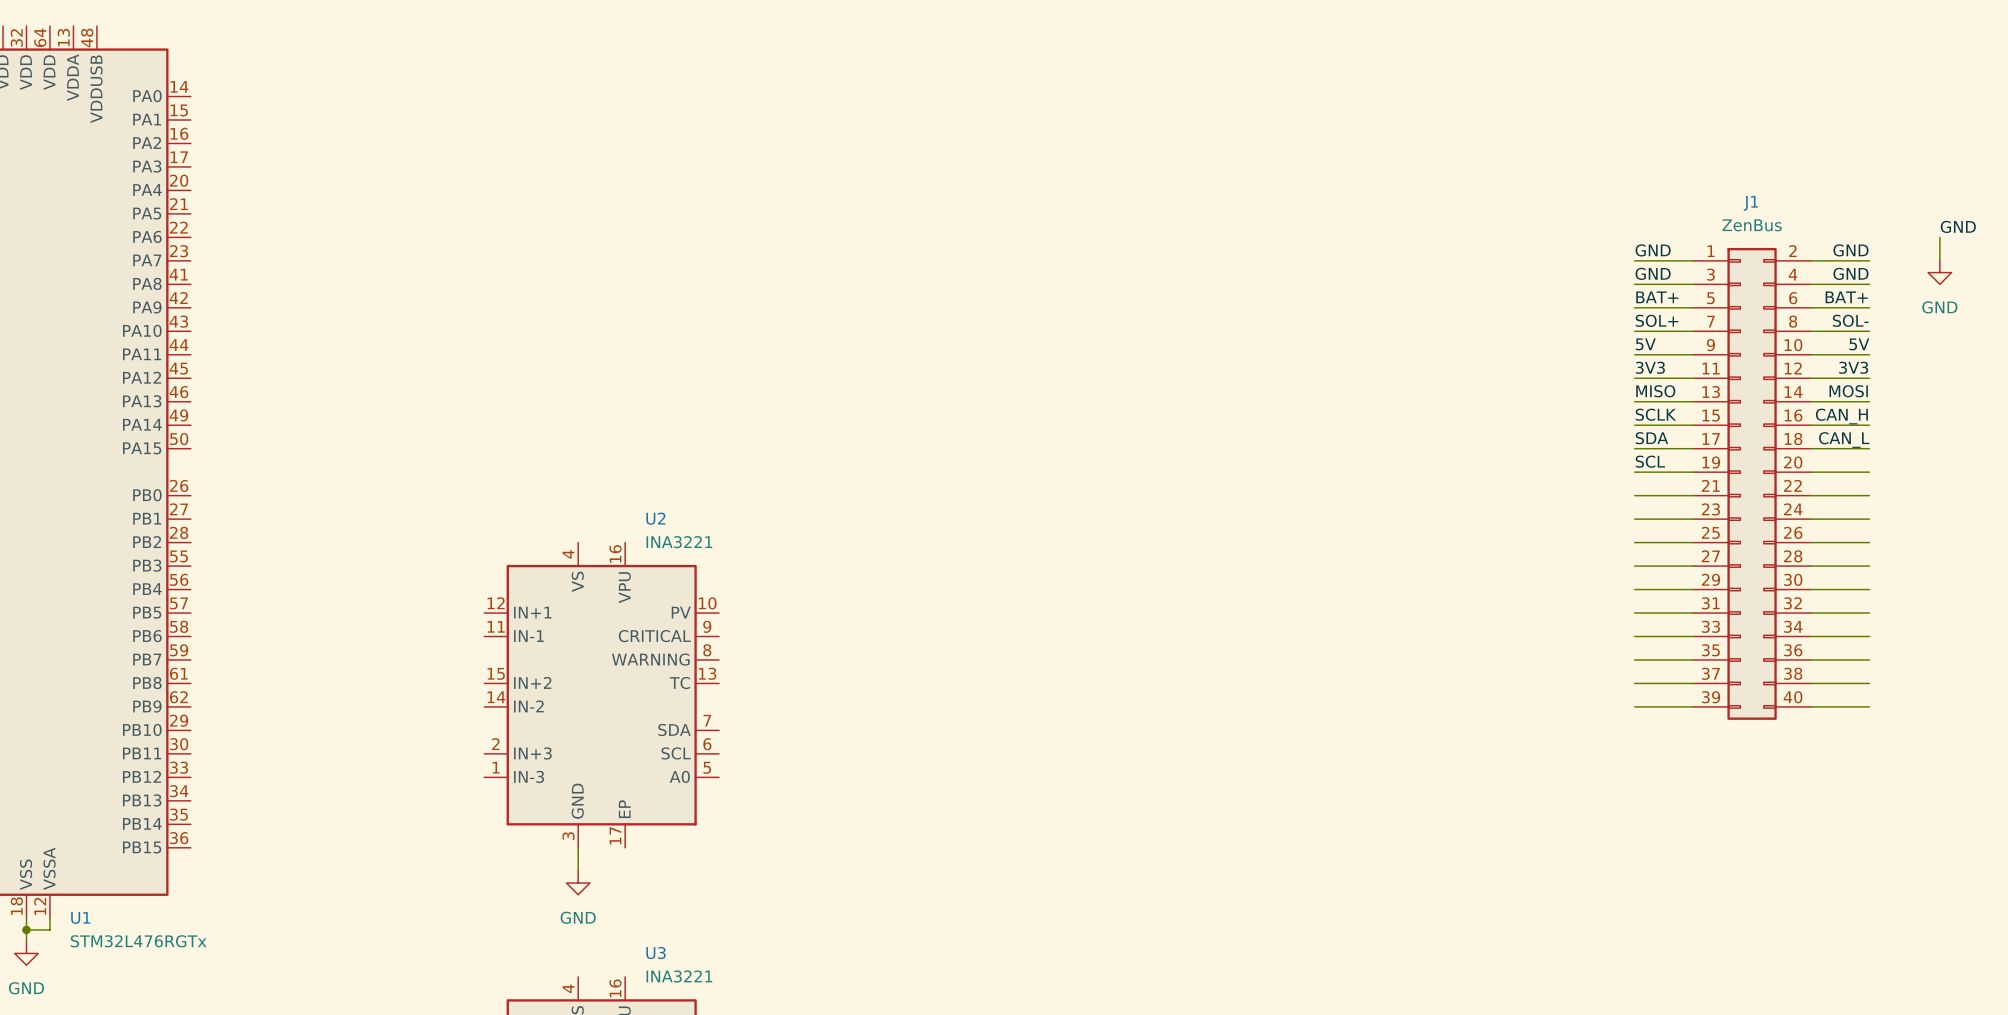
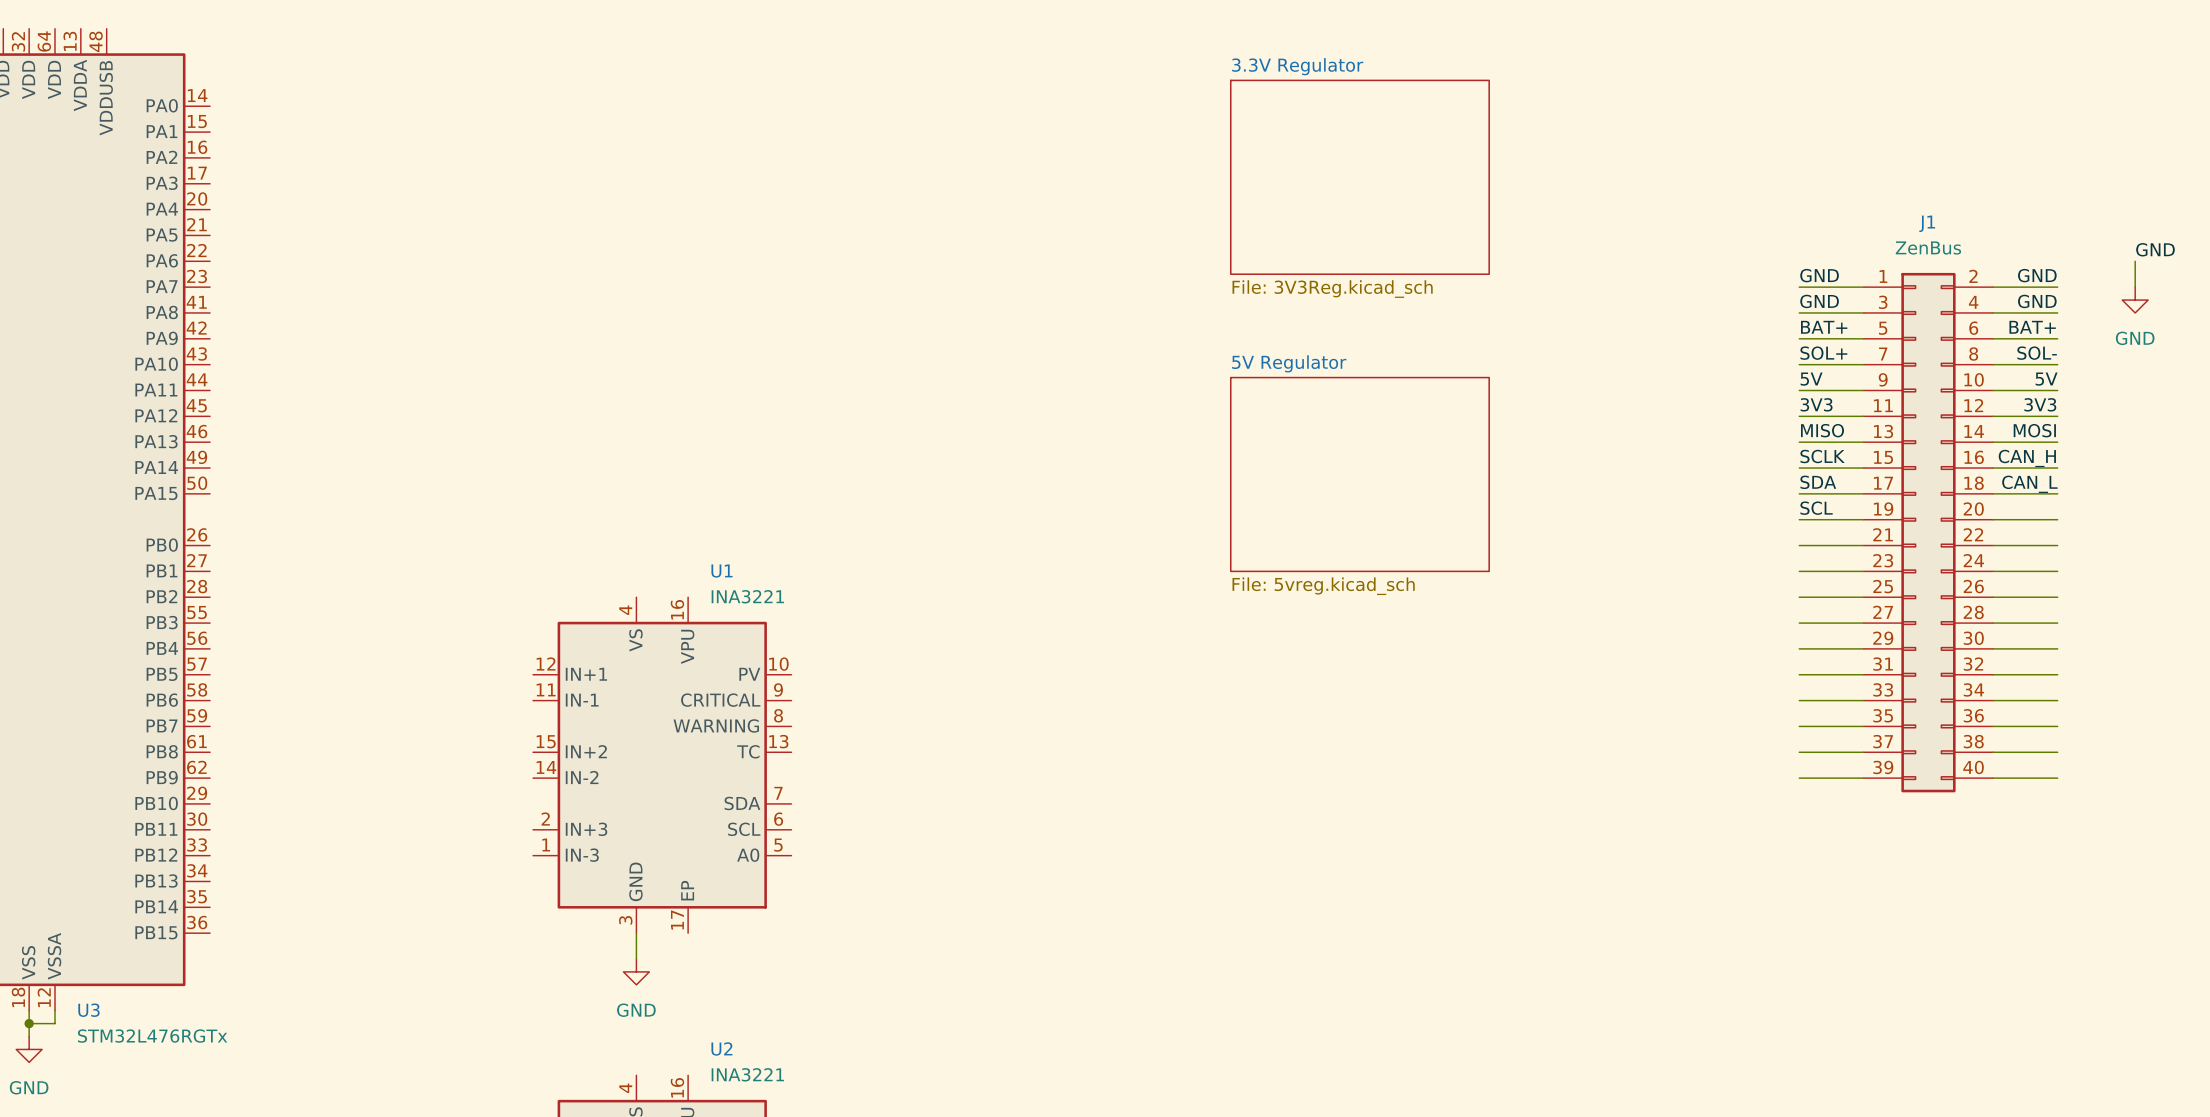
sheet 3.3V Regulator: none -> File: 3V3Reg.kicad_sch (1359, 177)
sheet 5V Regulator: none -> File: 5vreg.kicad_sch (1359, 474)
U2 name: U2 (655, 518) -> U1 (721, 571)
U1 name: U1 (80, 917) -> U3 (88, 1010)
U3 name: U3 (656, 953) -> U2 (721, 1048)

